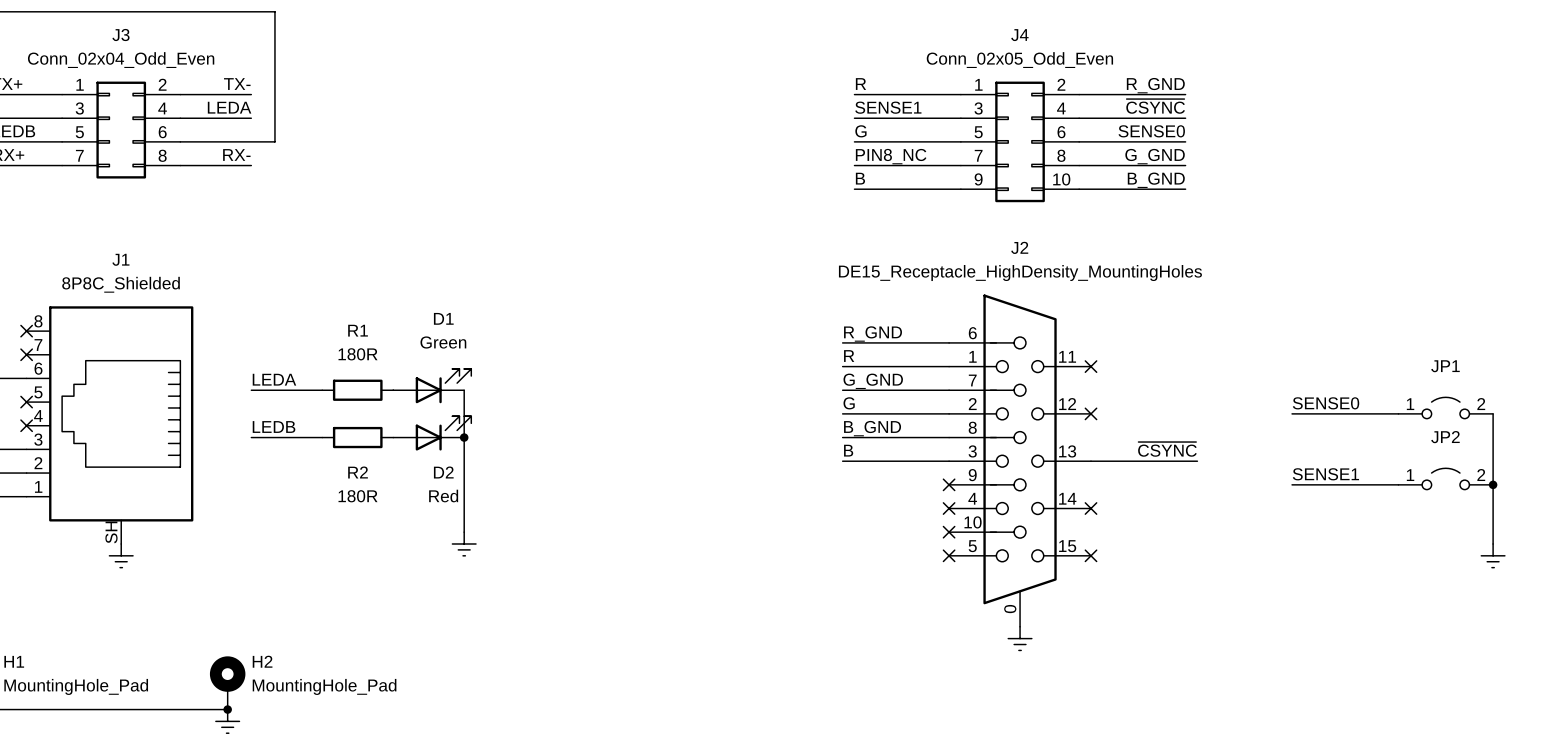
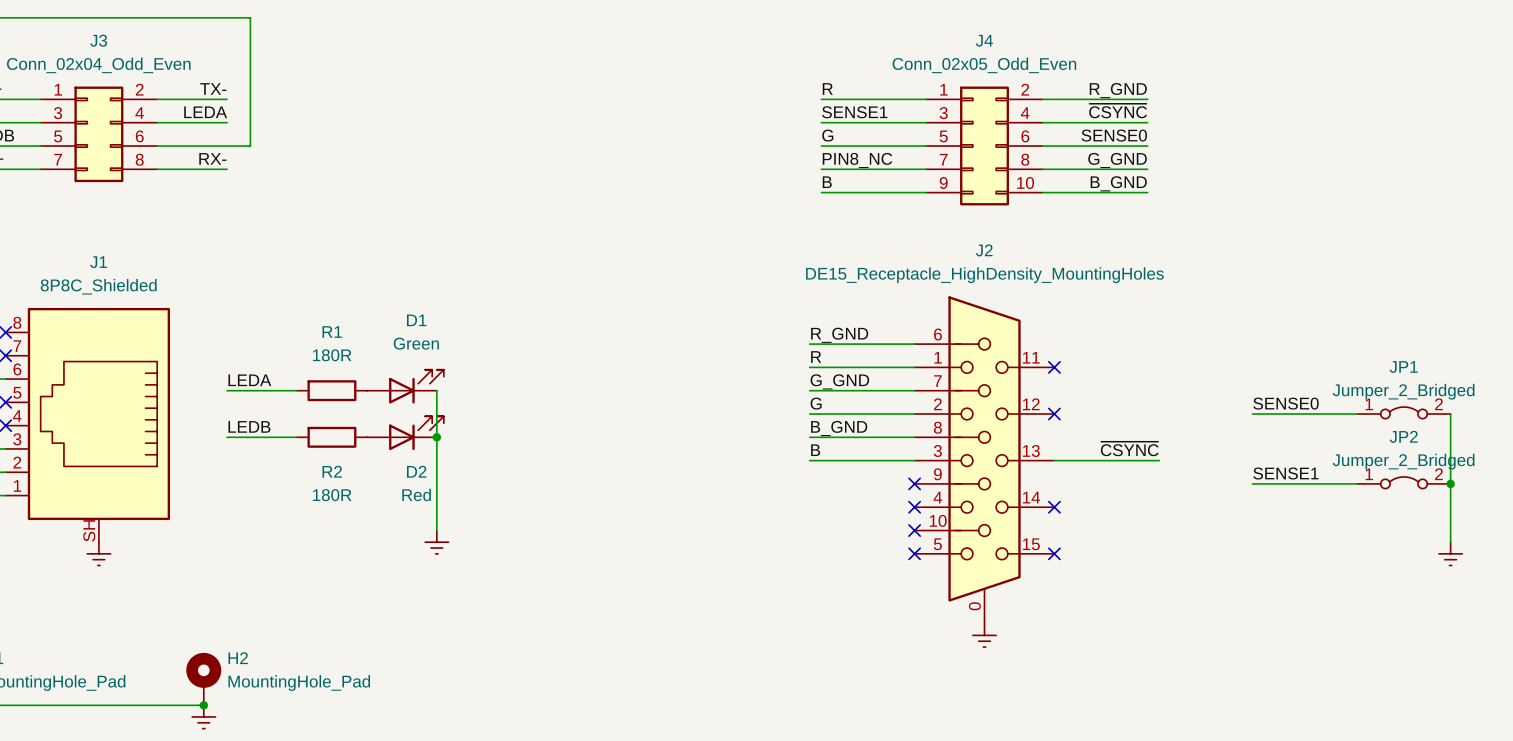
JP1 value: none -> Jumper_2_Bridged (1403, 391)
JP1 symbol: [1398, 397, 1494, 419] -> [1357, 407, 1451, 419]
JP2 value: none -> Jumper_2_Bridged (1403, 461)
JP2 symbol: [1398, 468, 1494, 490] -> [1357, 476, 1451, 489]

